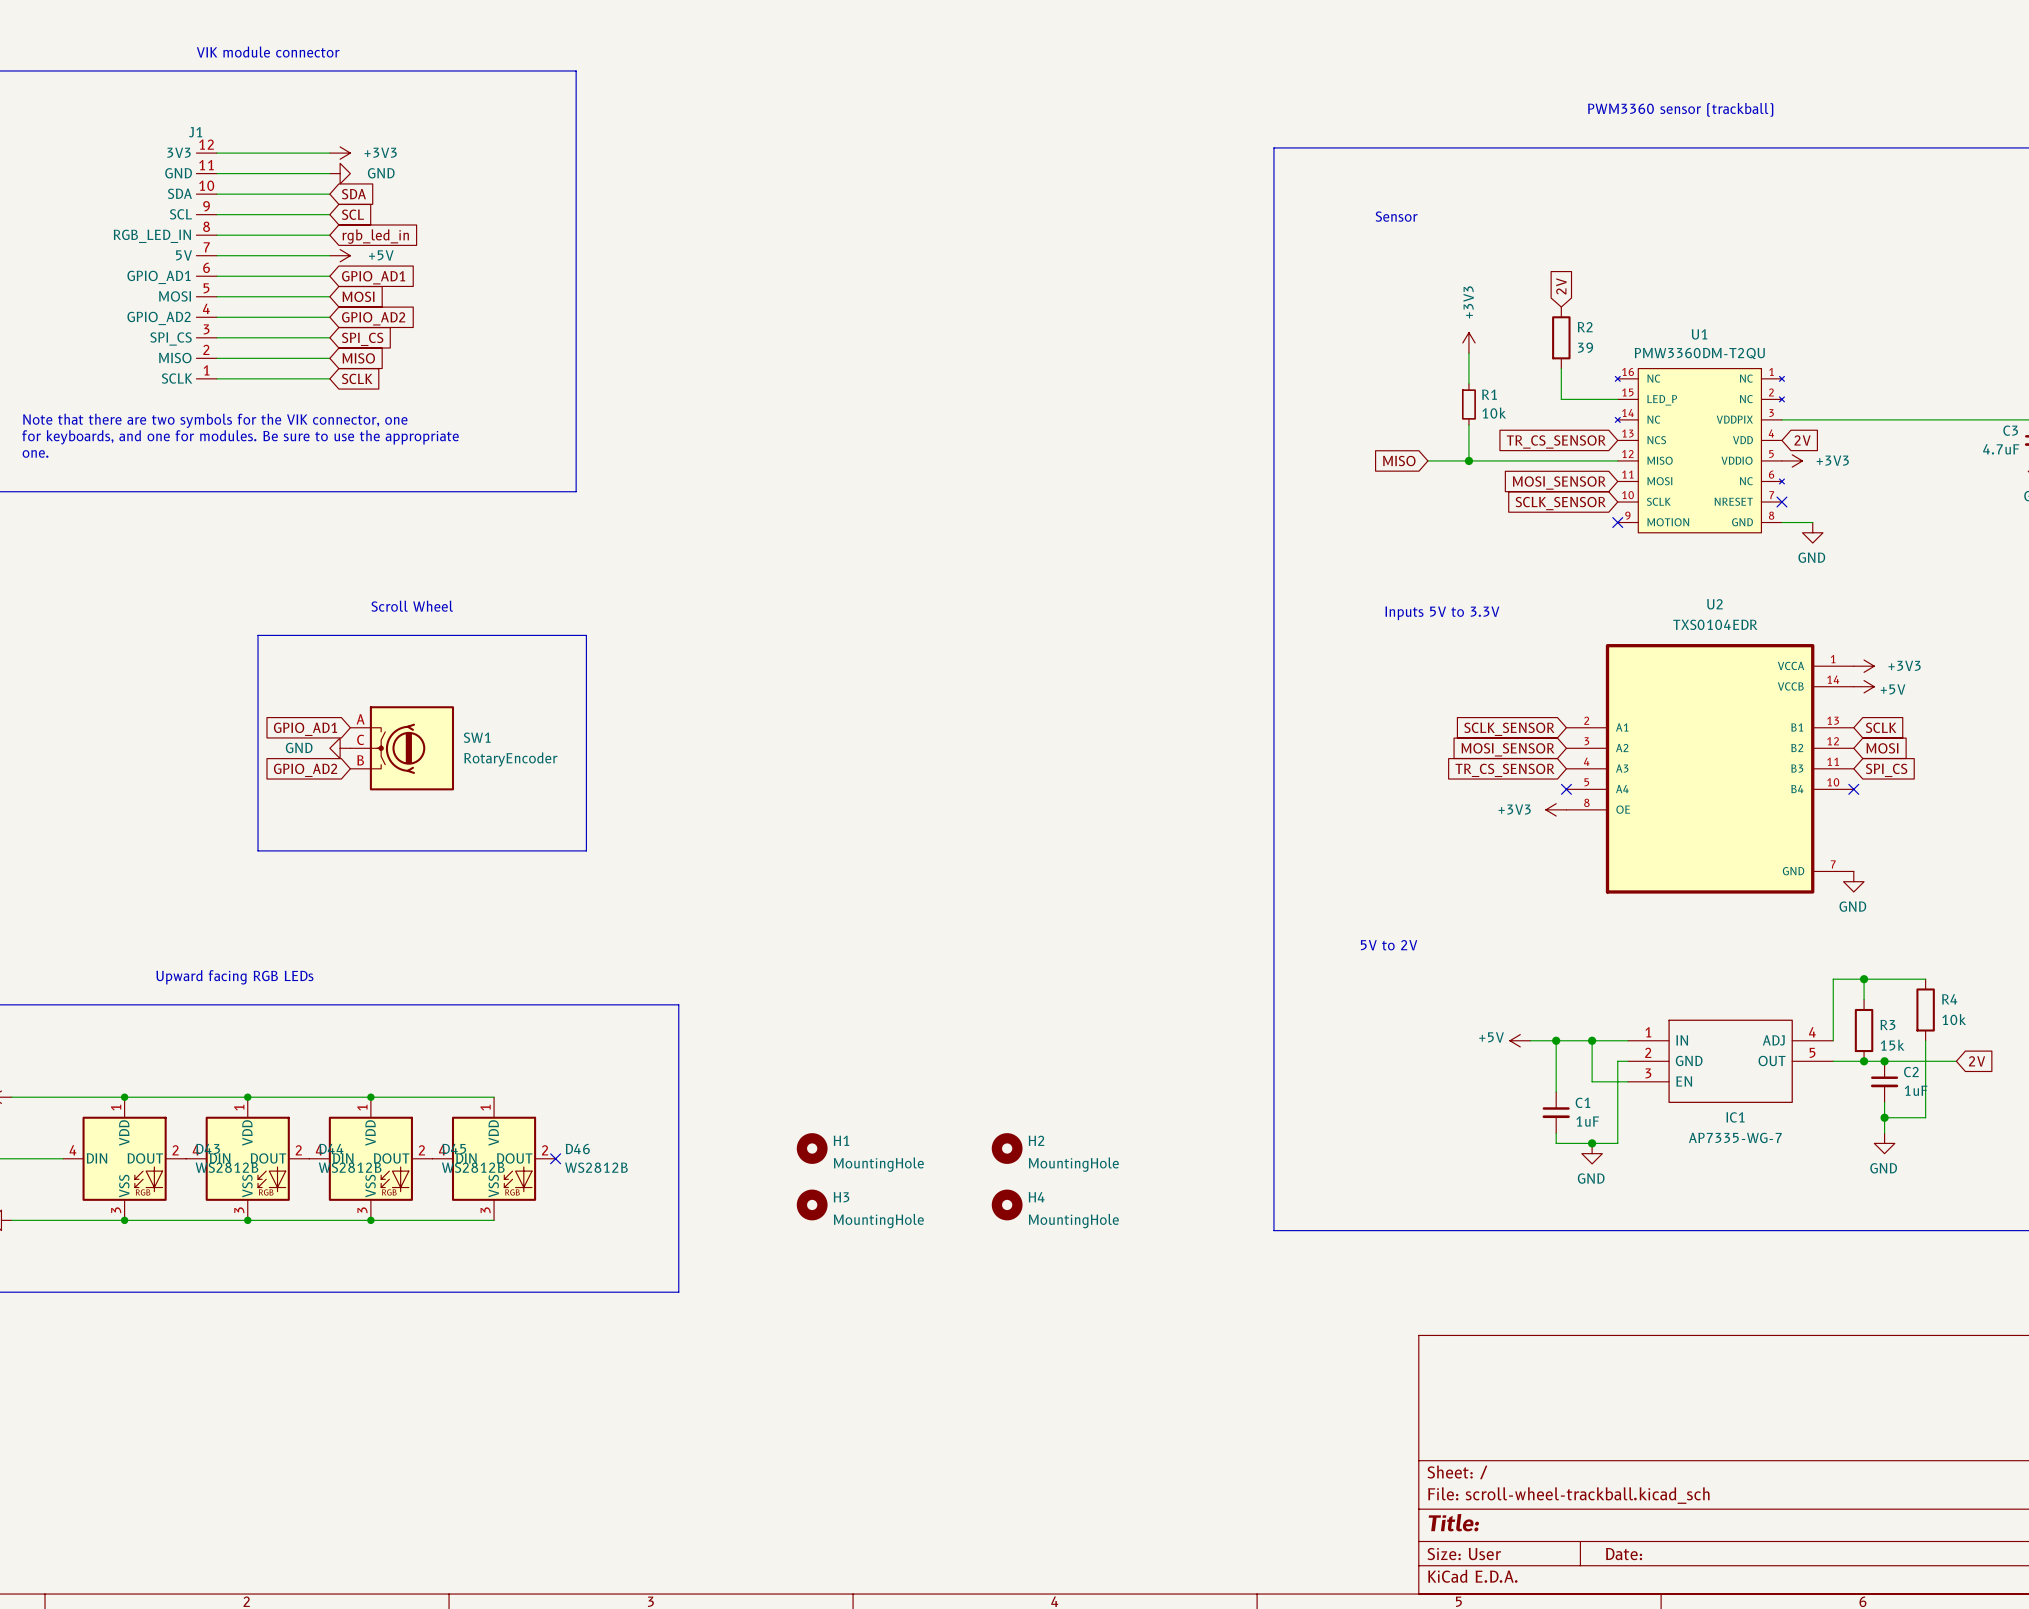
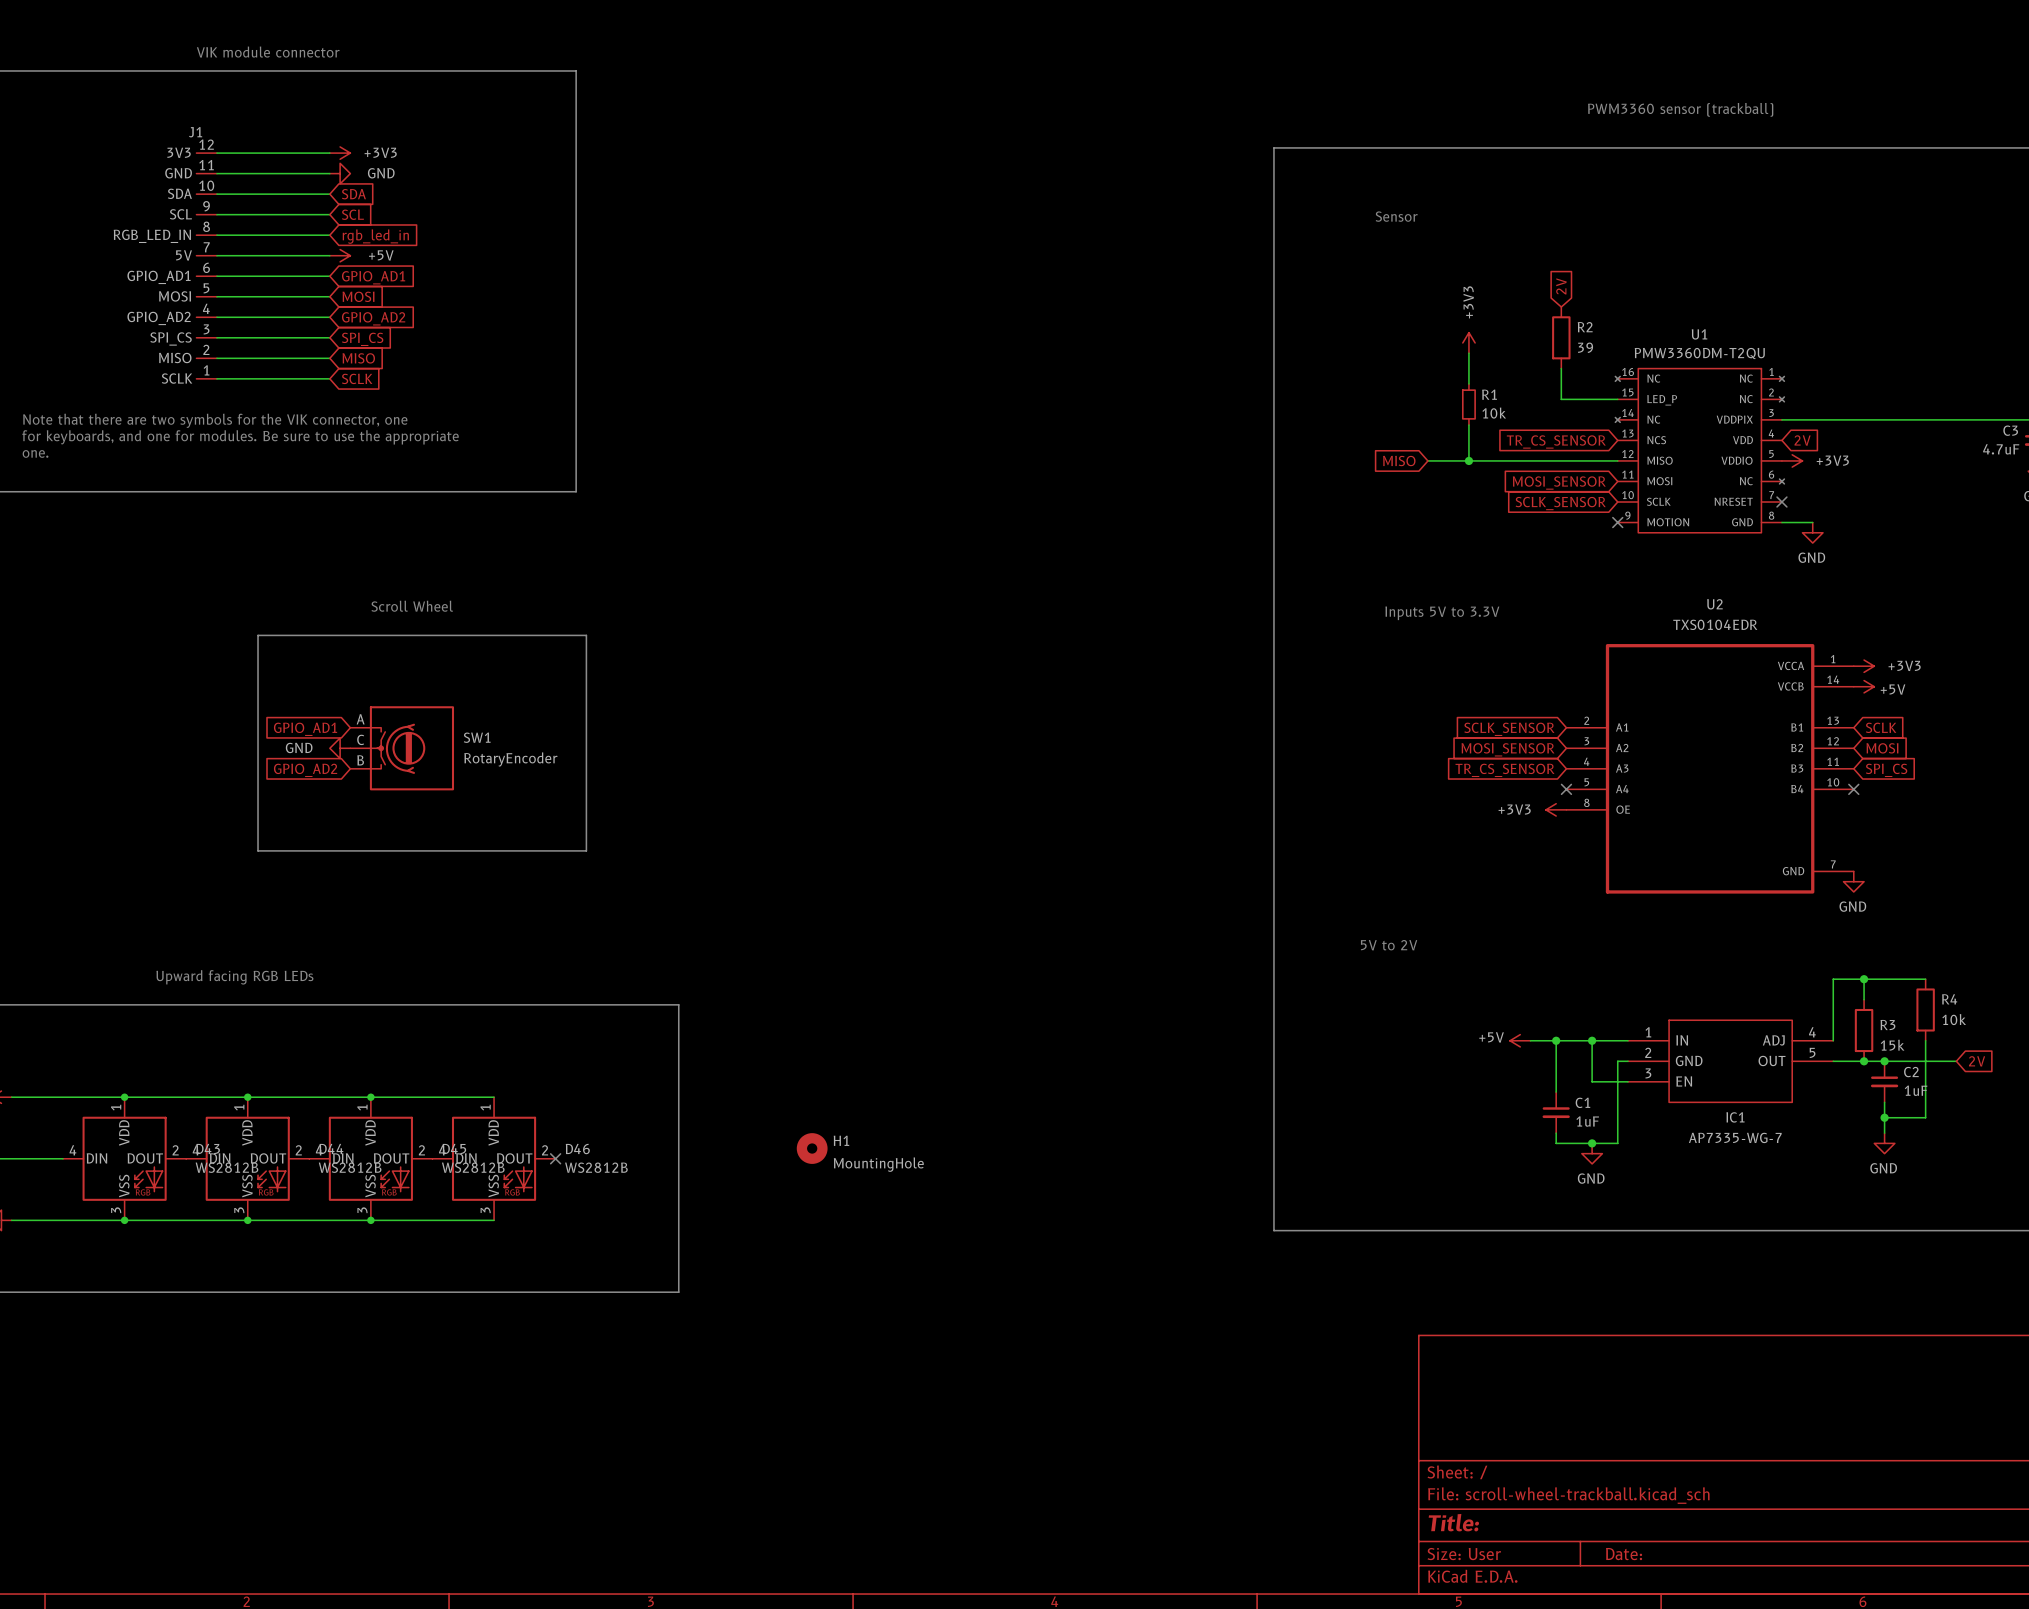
H2: MountingHole (1007, 1148) -> none
H3: MountingHole (812, 1204) -> none
H4: MountingHole (1007, 1204) -> none

